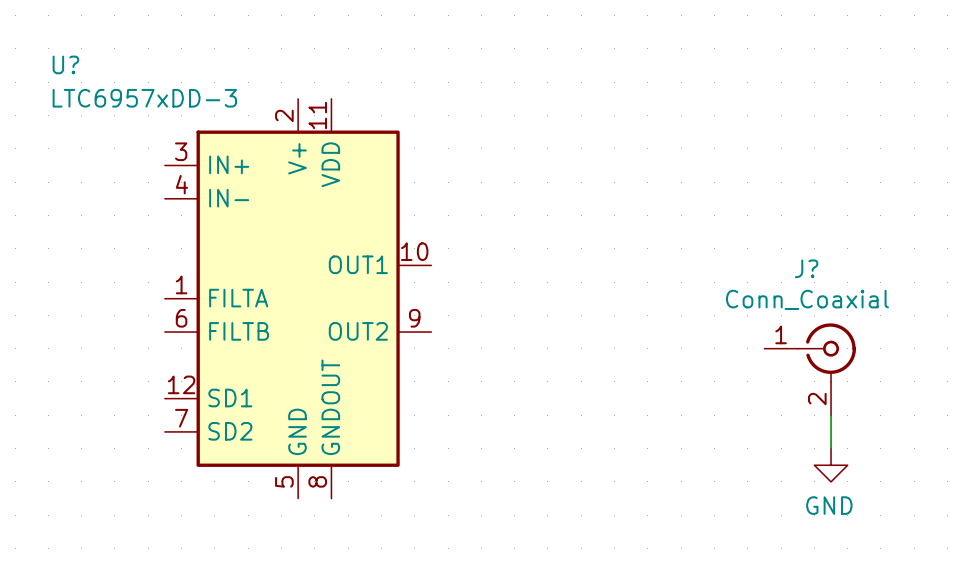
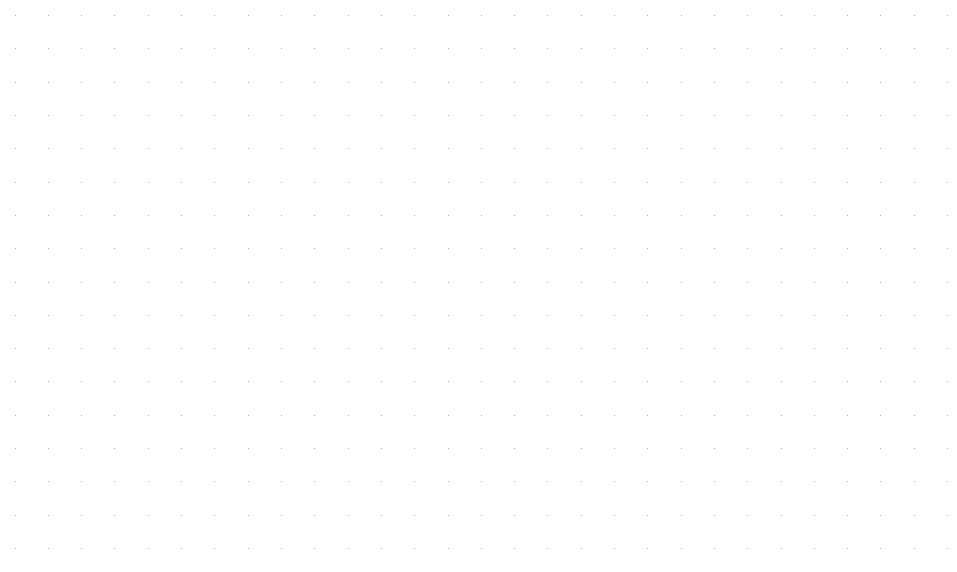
U?: LTC6957xDD-3 (298, 298) -> none
J?: Conn_Coaxial (810, 369) -> none
wire: (831, 415) (831, 448) -> none
power symbol: GND (831, 465) -> none

